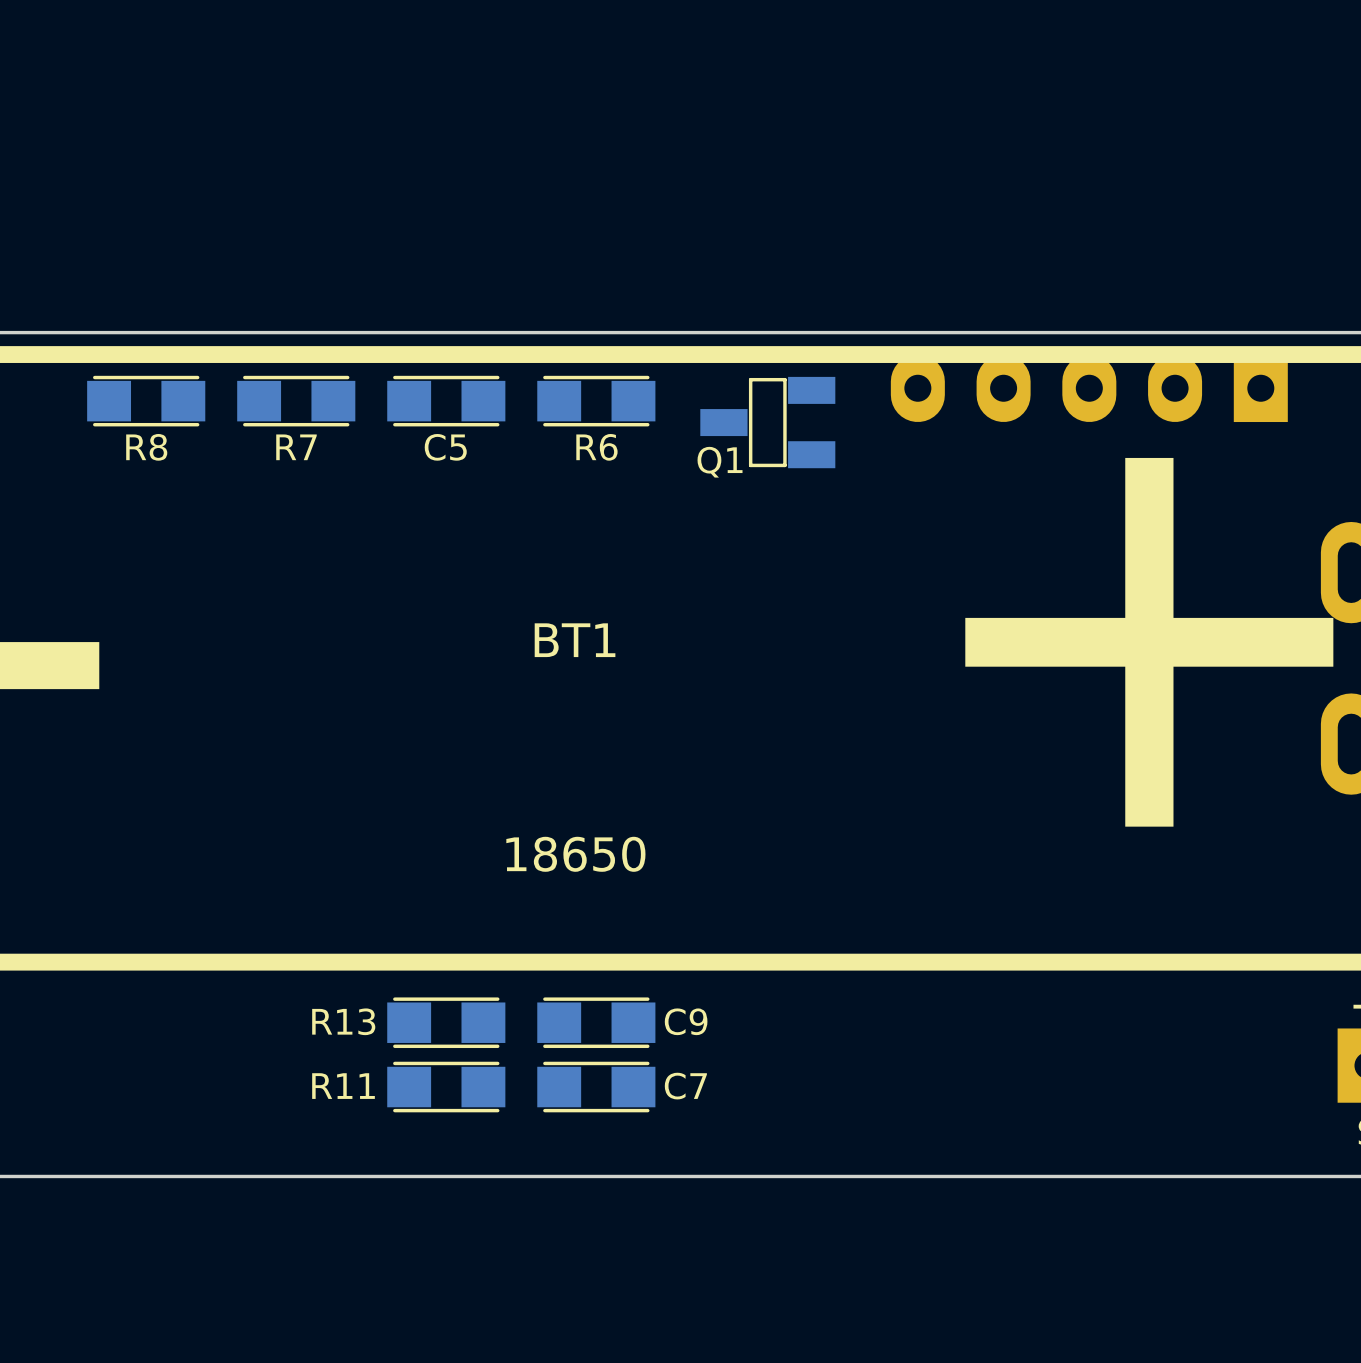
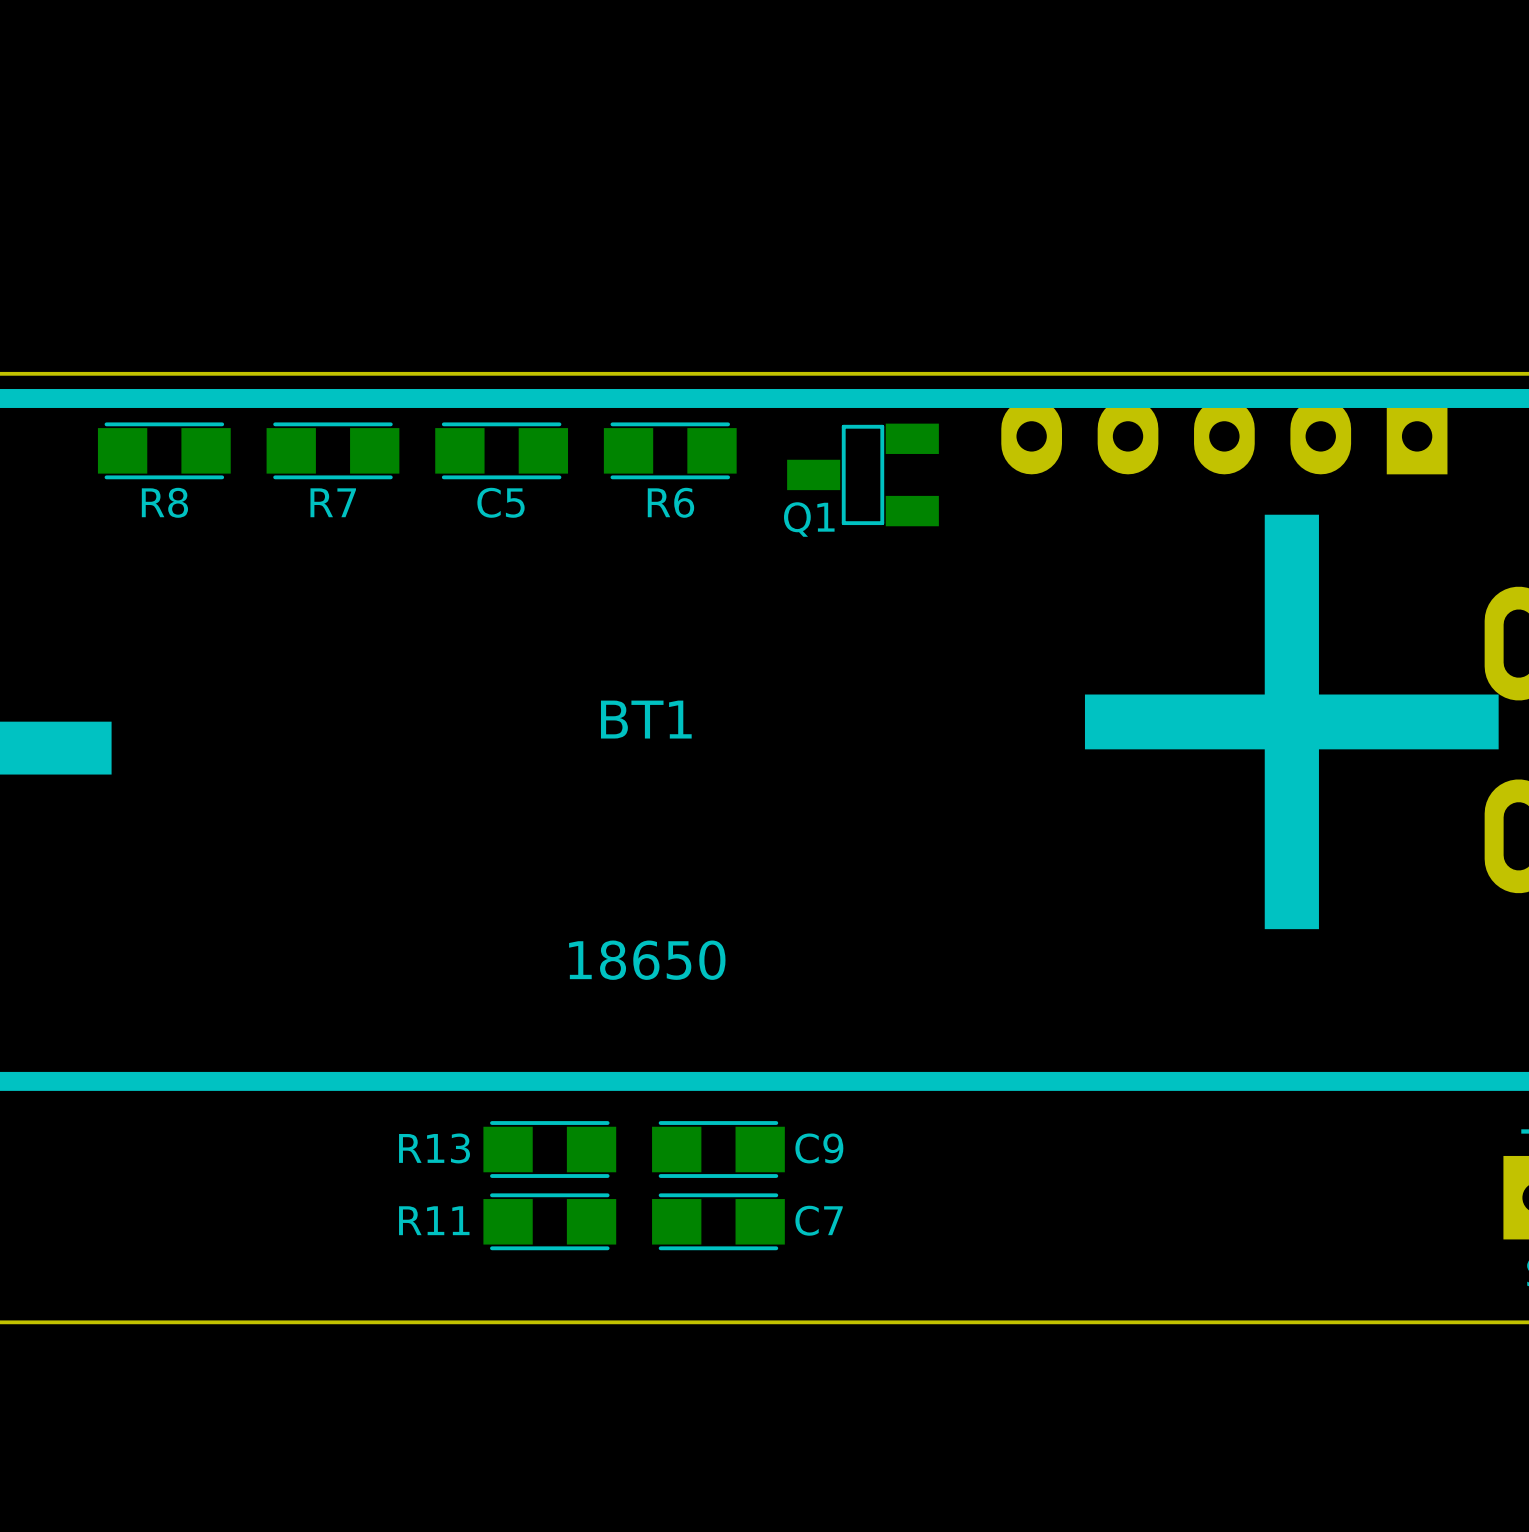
R13 position: (446, 1022) -> (549, 1149)
C9 position: (596, 1022) -> (718, 1149)
R11 position: (446, 1087) -> (549, 1221)
C7 position: (596, 1087) -> (718, 1221)

